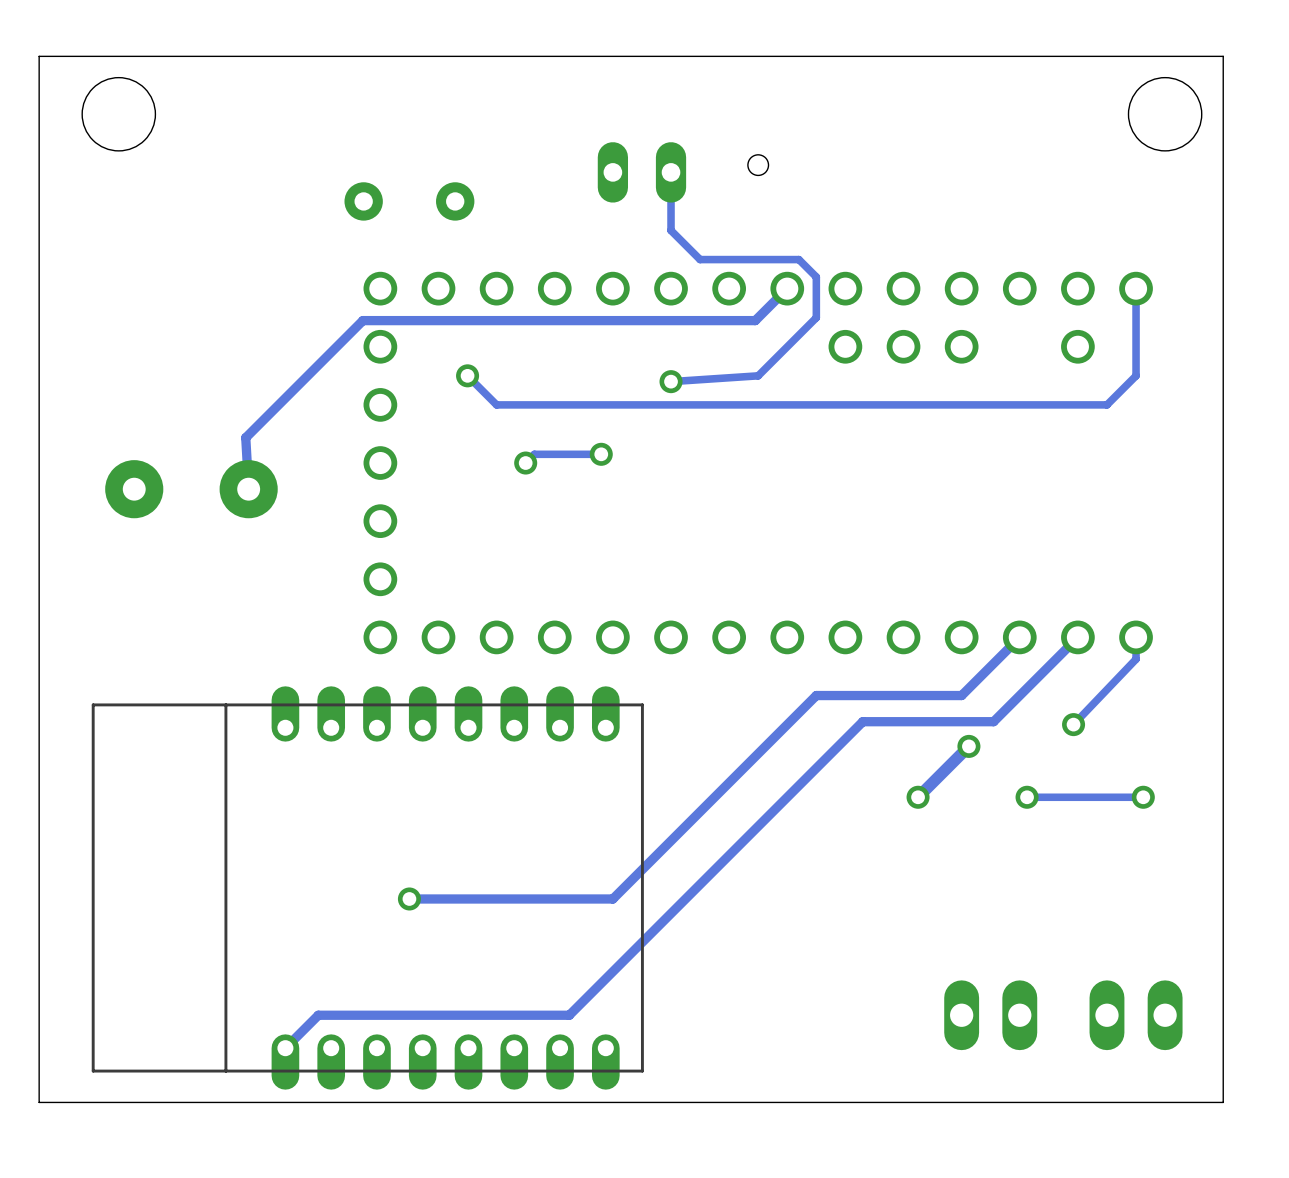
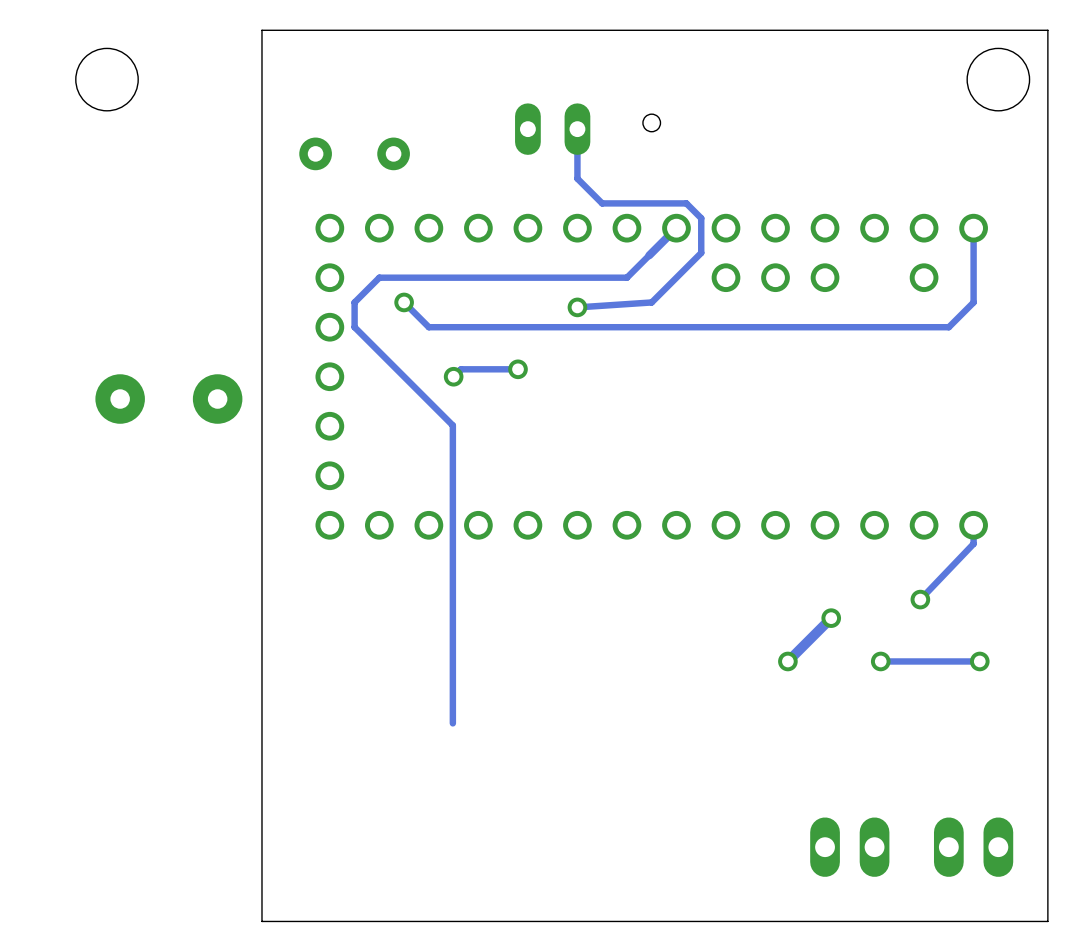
board edge: (300, 56) (39, 56) (39, 1102) (300, 1102) -> (261, 30) (261, 921)
track: (755, 320) (362, 320) (245, 437) (248, 489) -> (649, 255) (626, 277) (379, 277) (354, 302) (354, 327) (452, 425) (452, 723)
track: (1019, 637) (961, 695) (816, 695) (612, 898) (409, 898) -> none
track: (1077, 637) (993, 721) (862, 721) (569, 1015) (318, 1015) (285, 1048) -> none
part: (367, 887) -> none
via: (409, 898) -> none

